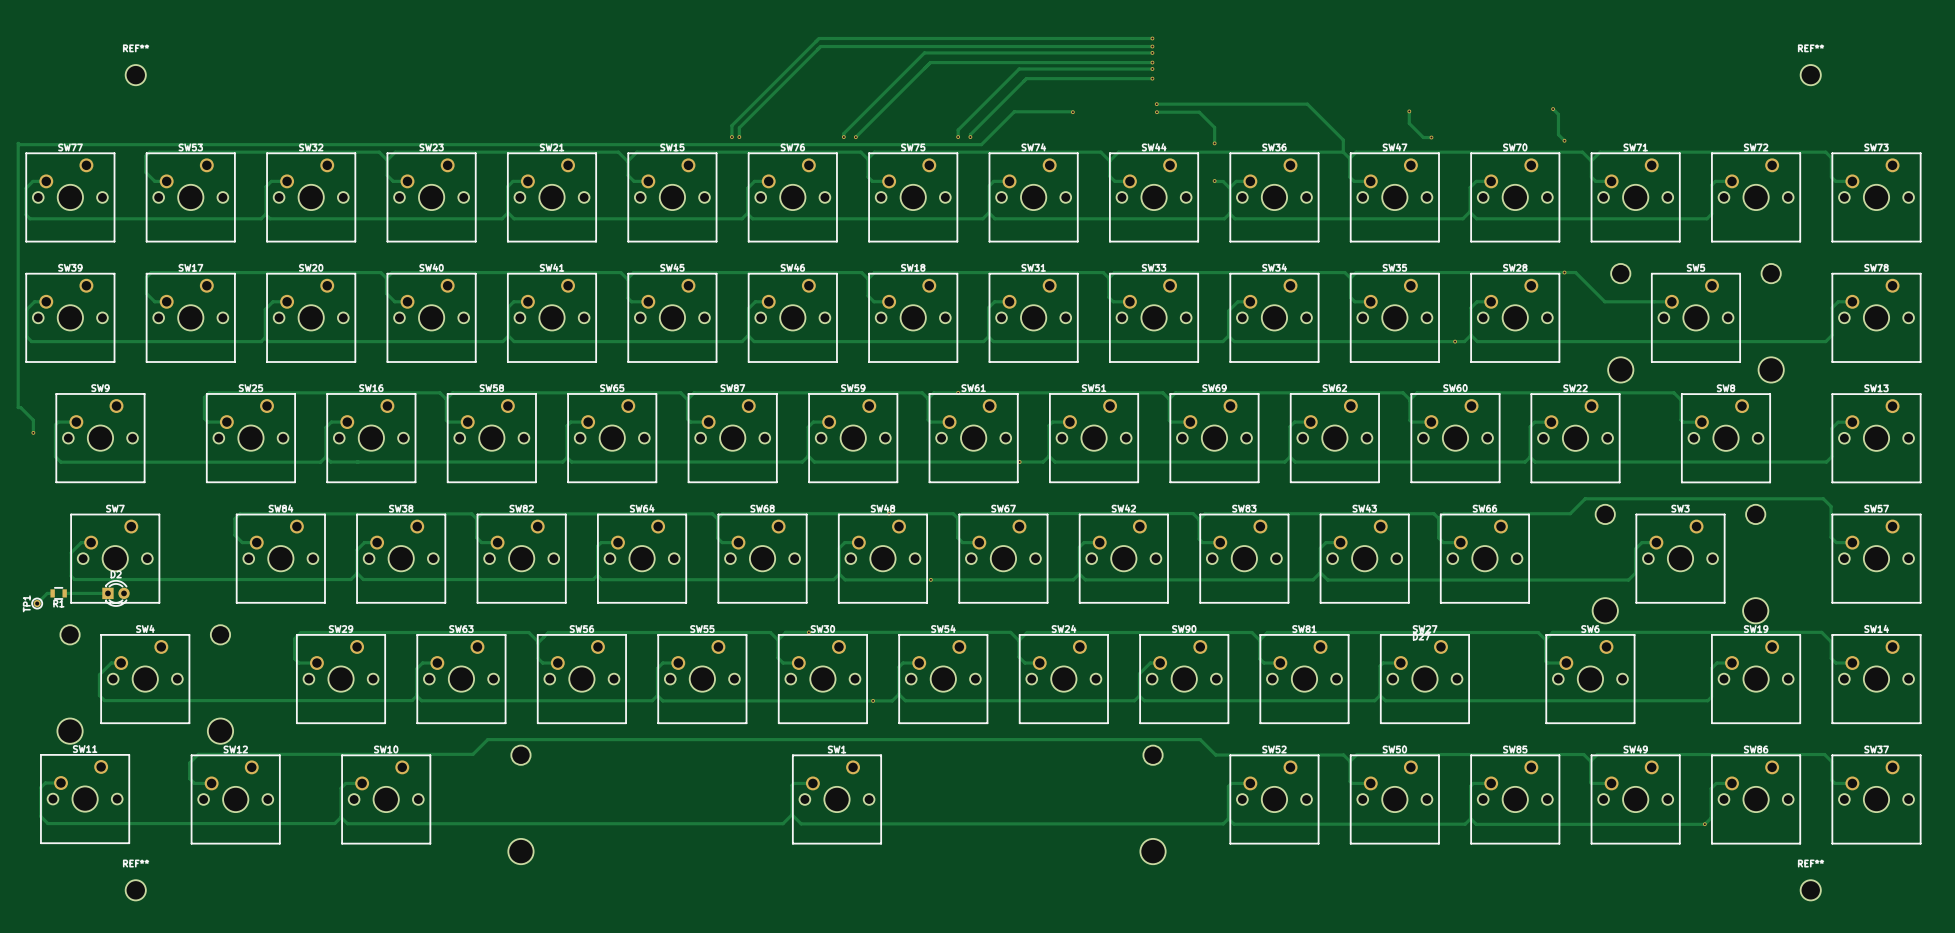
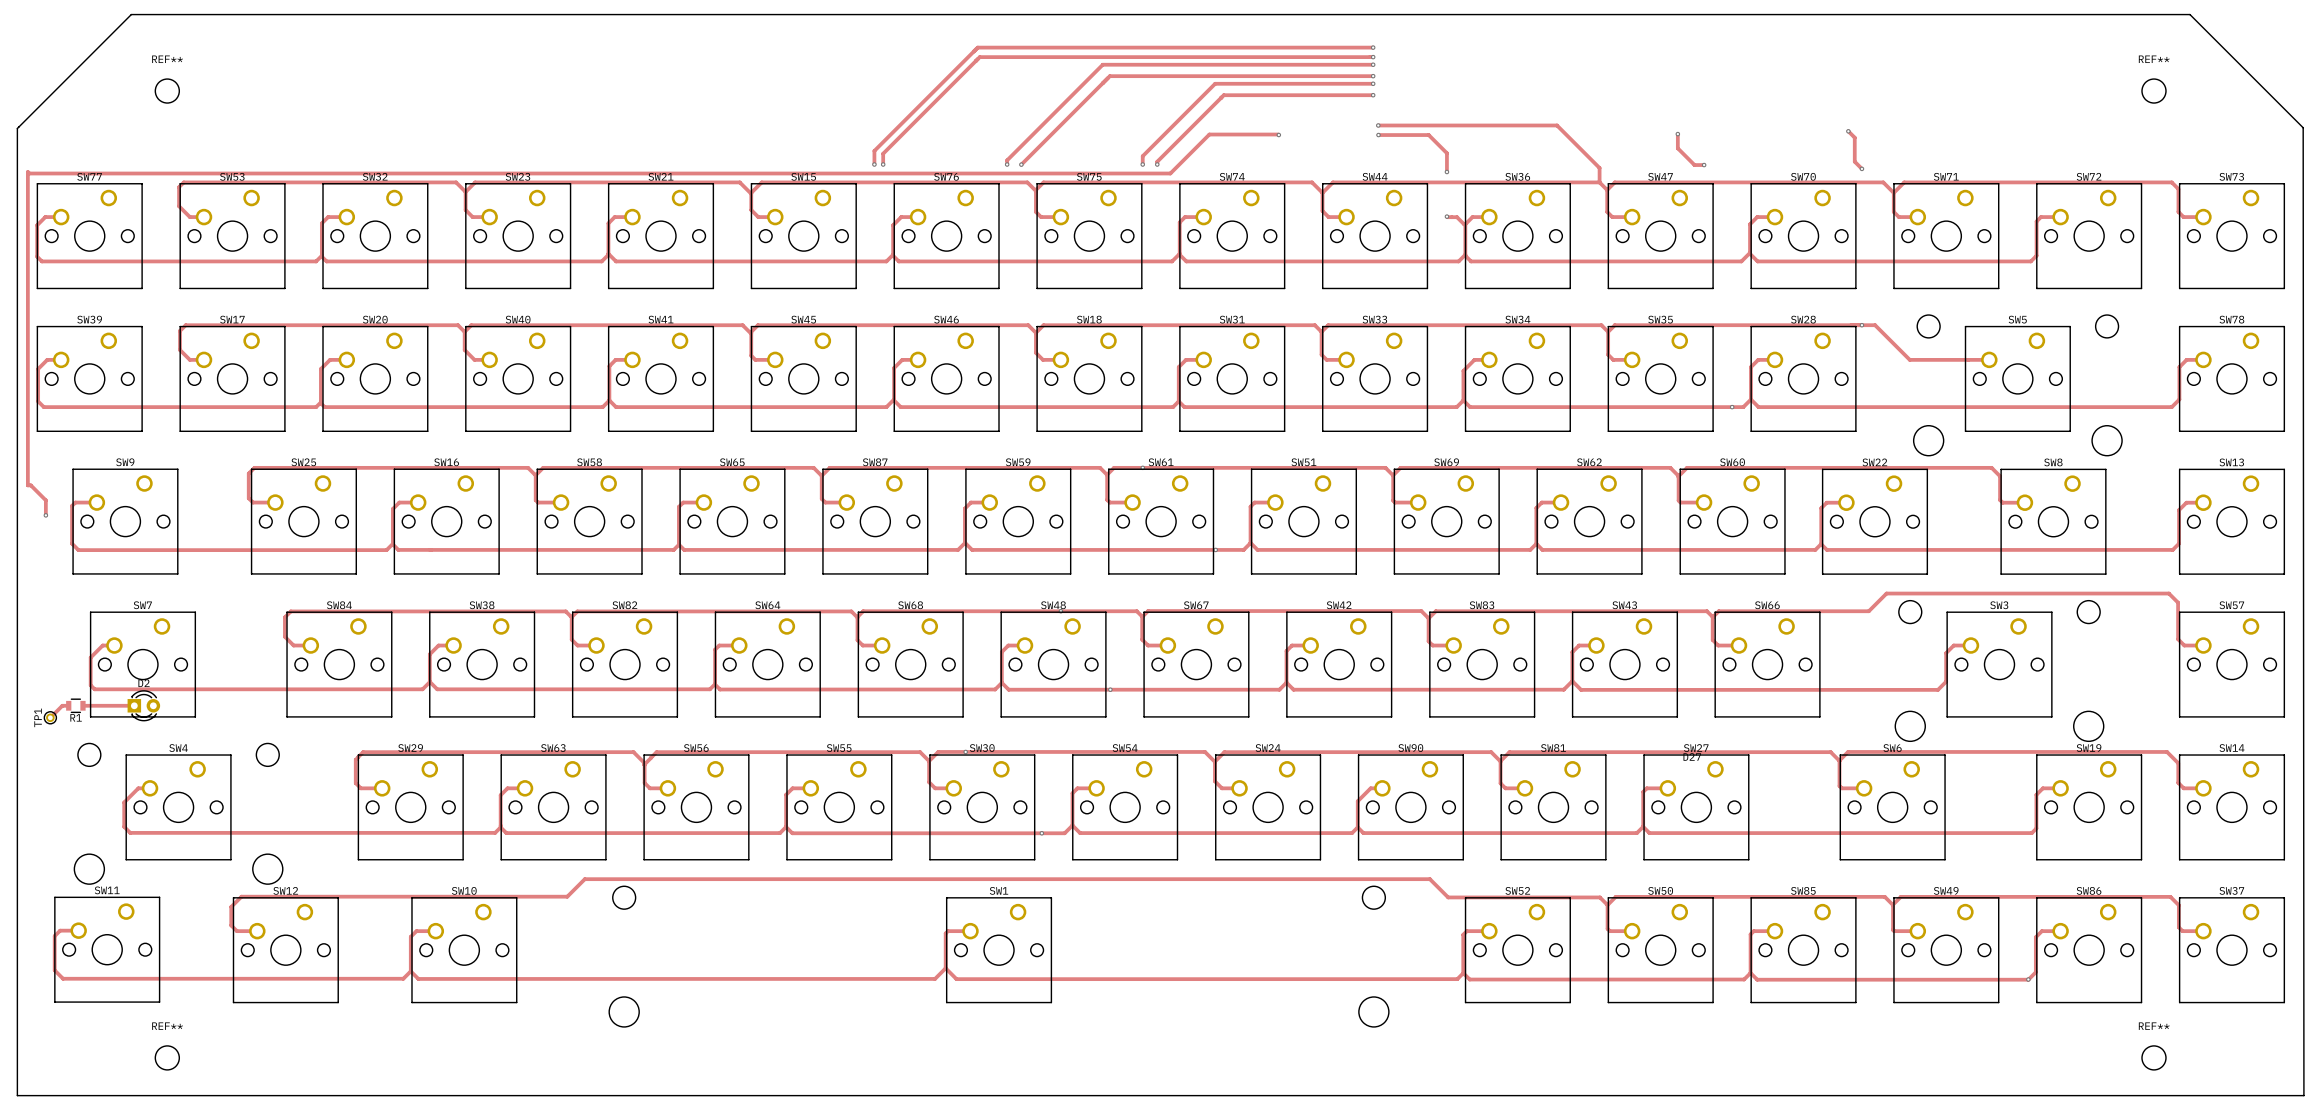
board edge: none -> (131, 14) (2189, 14) (2303, 127) (2303, 1095) (17, 1095) (17, 128) (131, 14)

